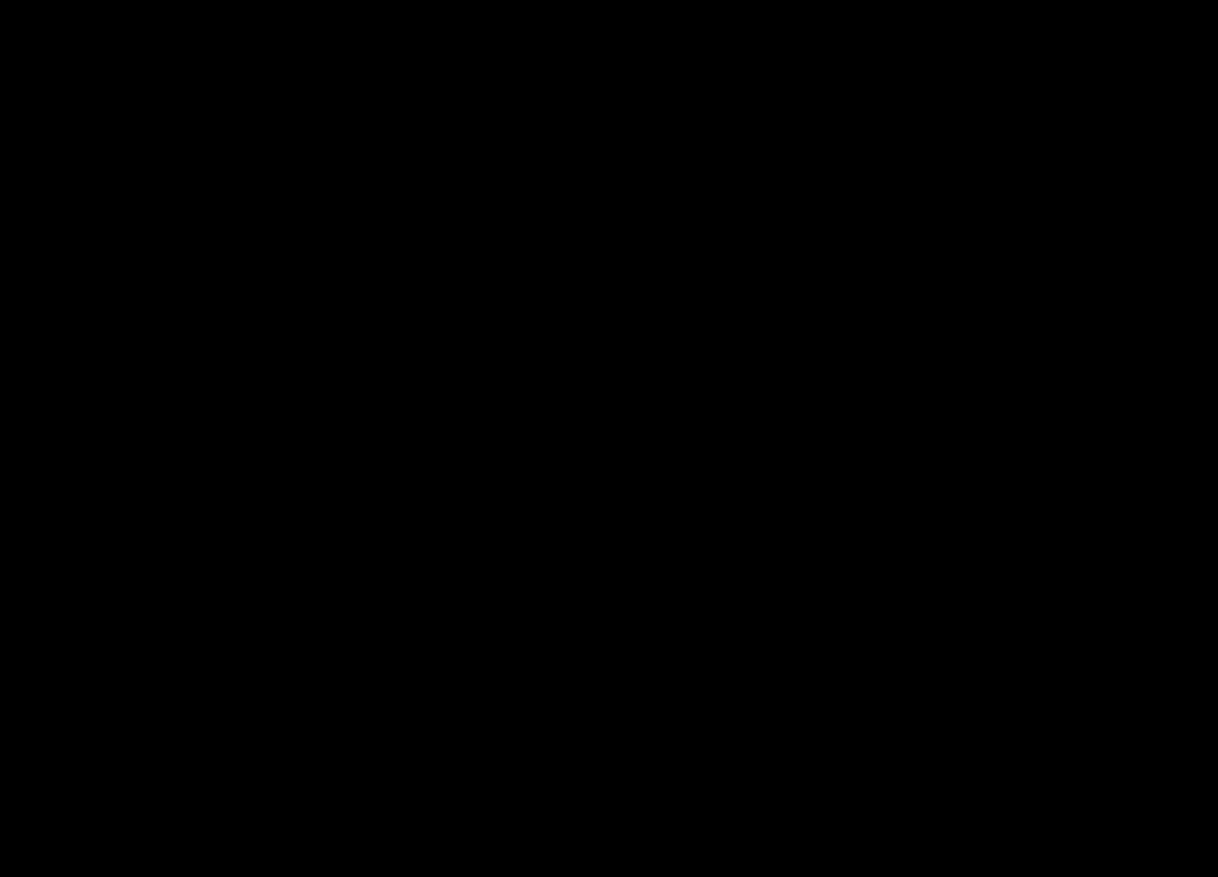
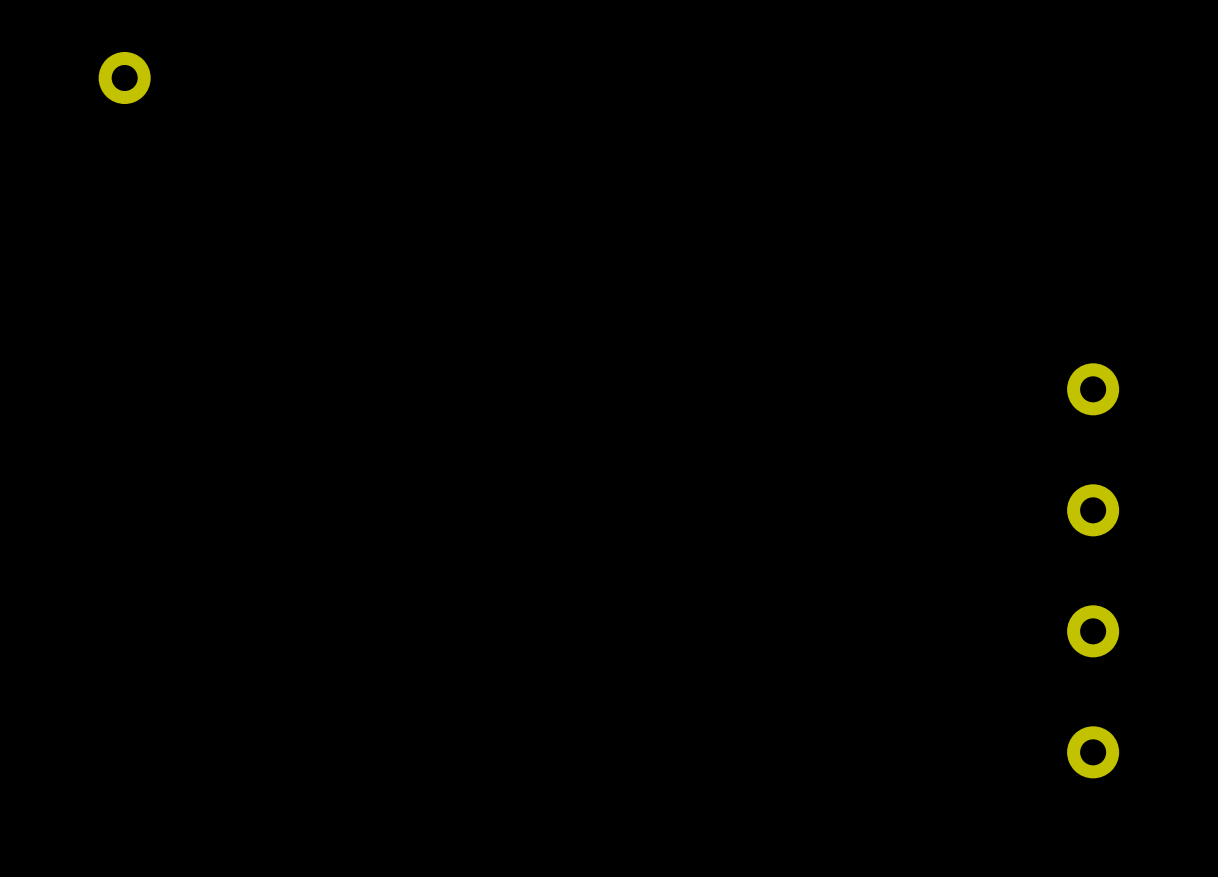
part: none -> (124, 77)
part: none -> (1093, 389)
part: none -> (1093, 510)
part: none -> (1093, 631)
part: none -> (1093, 752)

